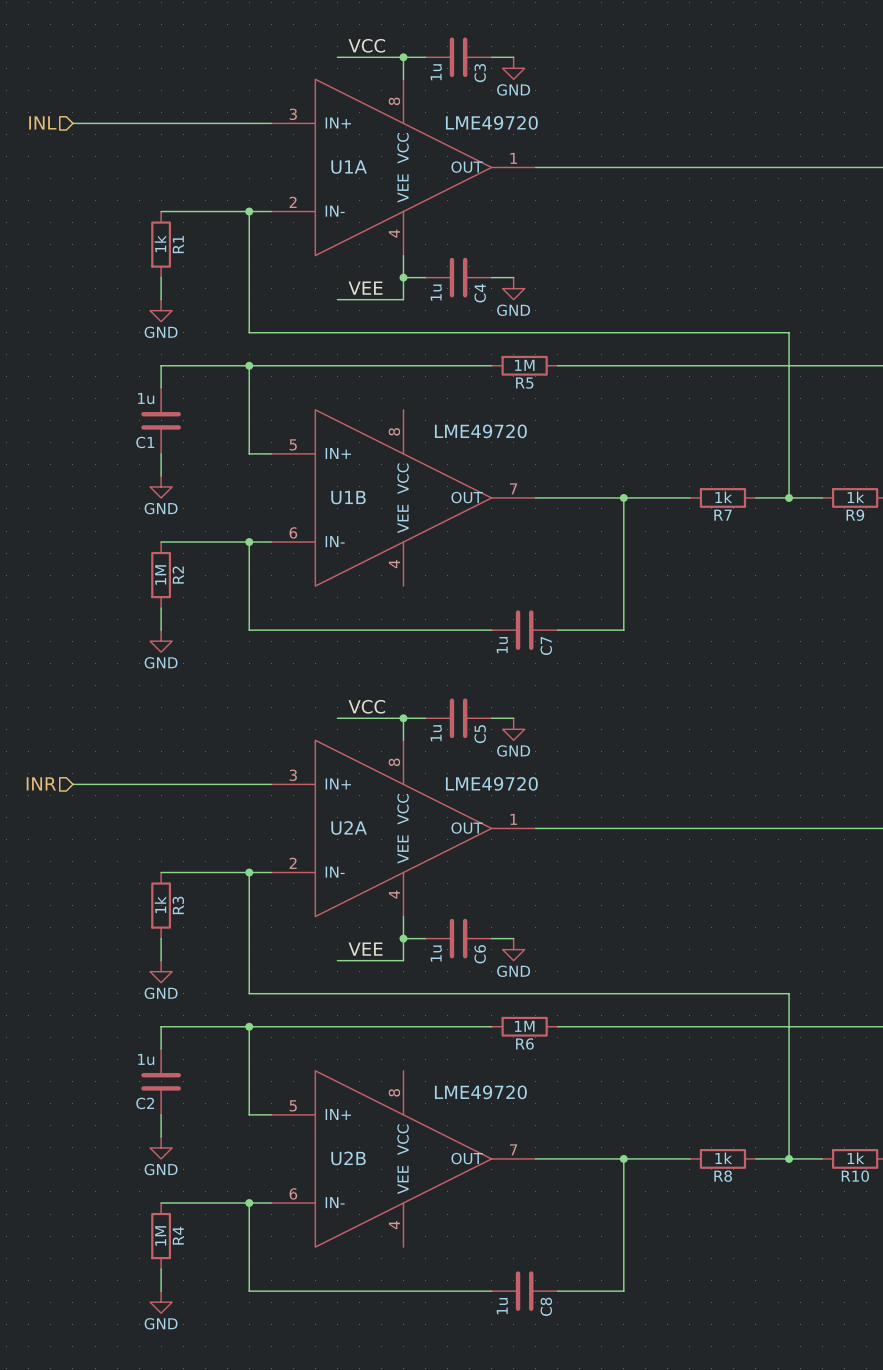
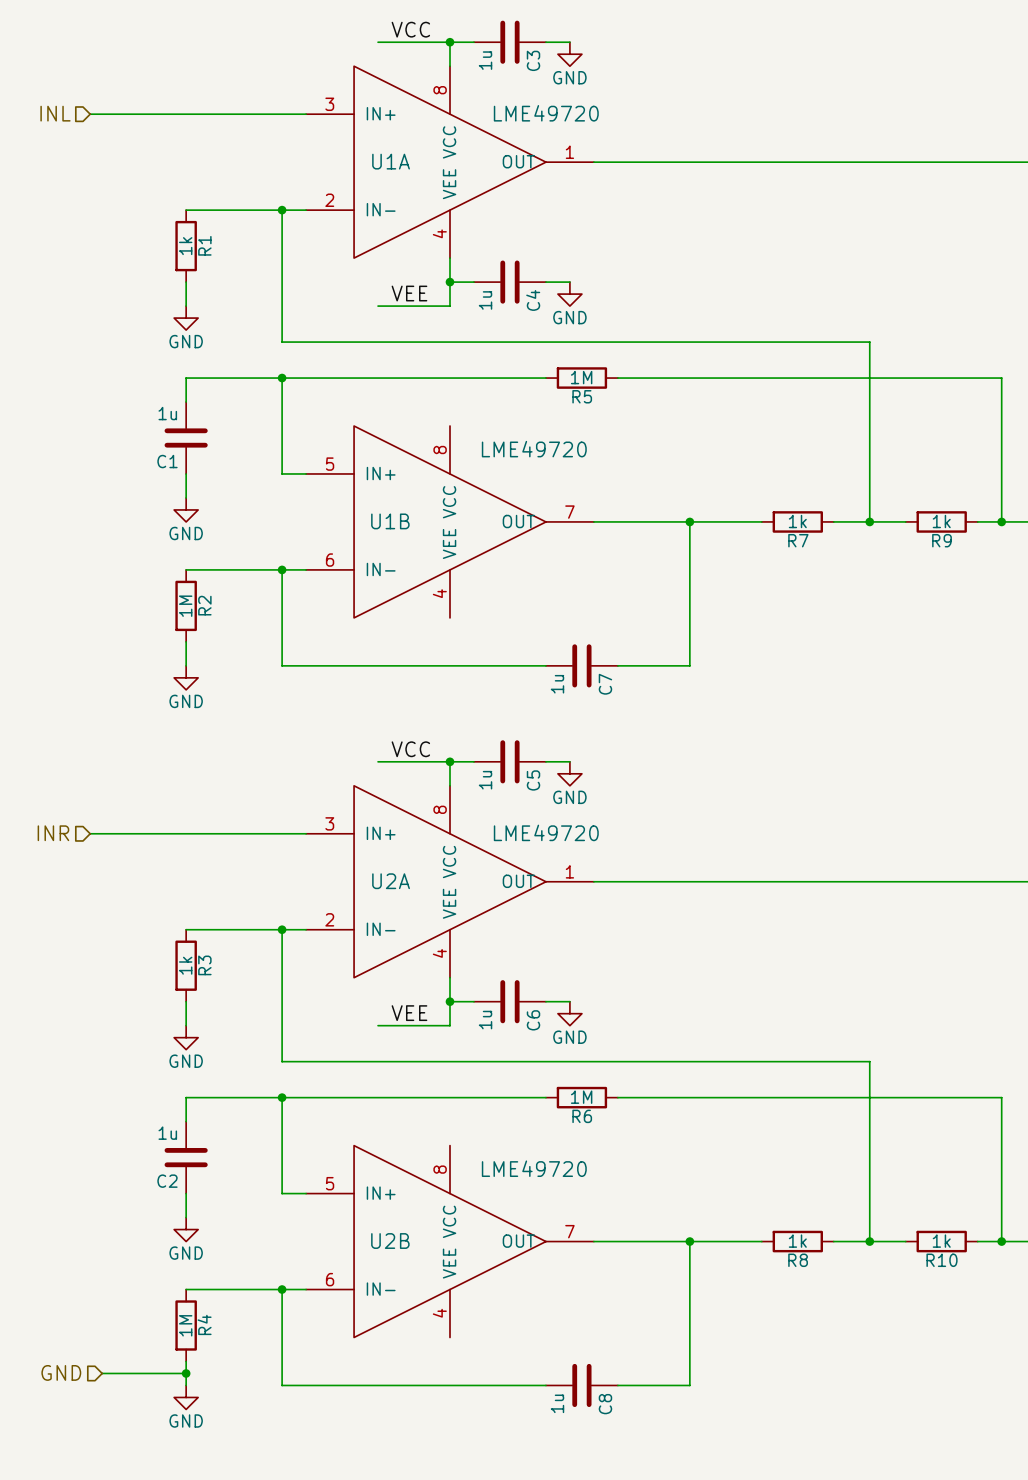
hierarchical label: none -> GND (61, 1372)
wire: none -> (102, 1373) (186, 1373)
junction: none -> (186, 1373)

